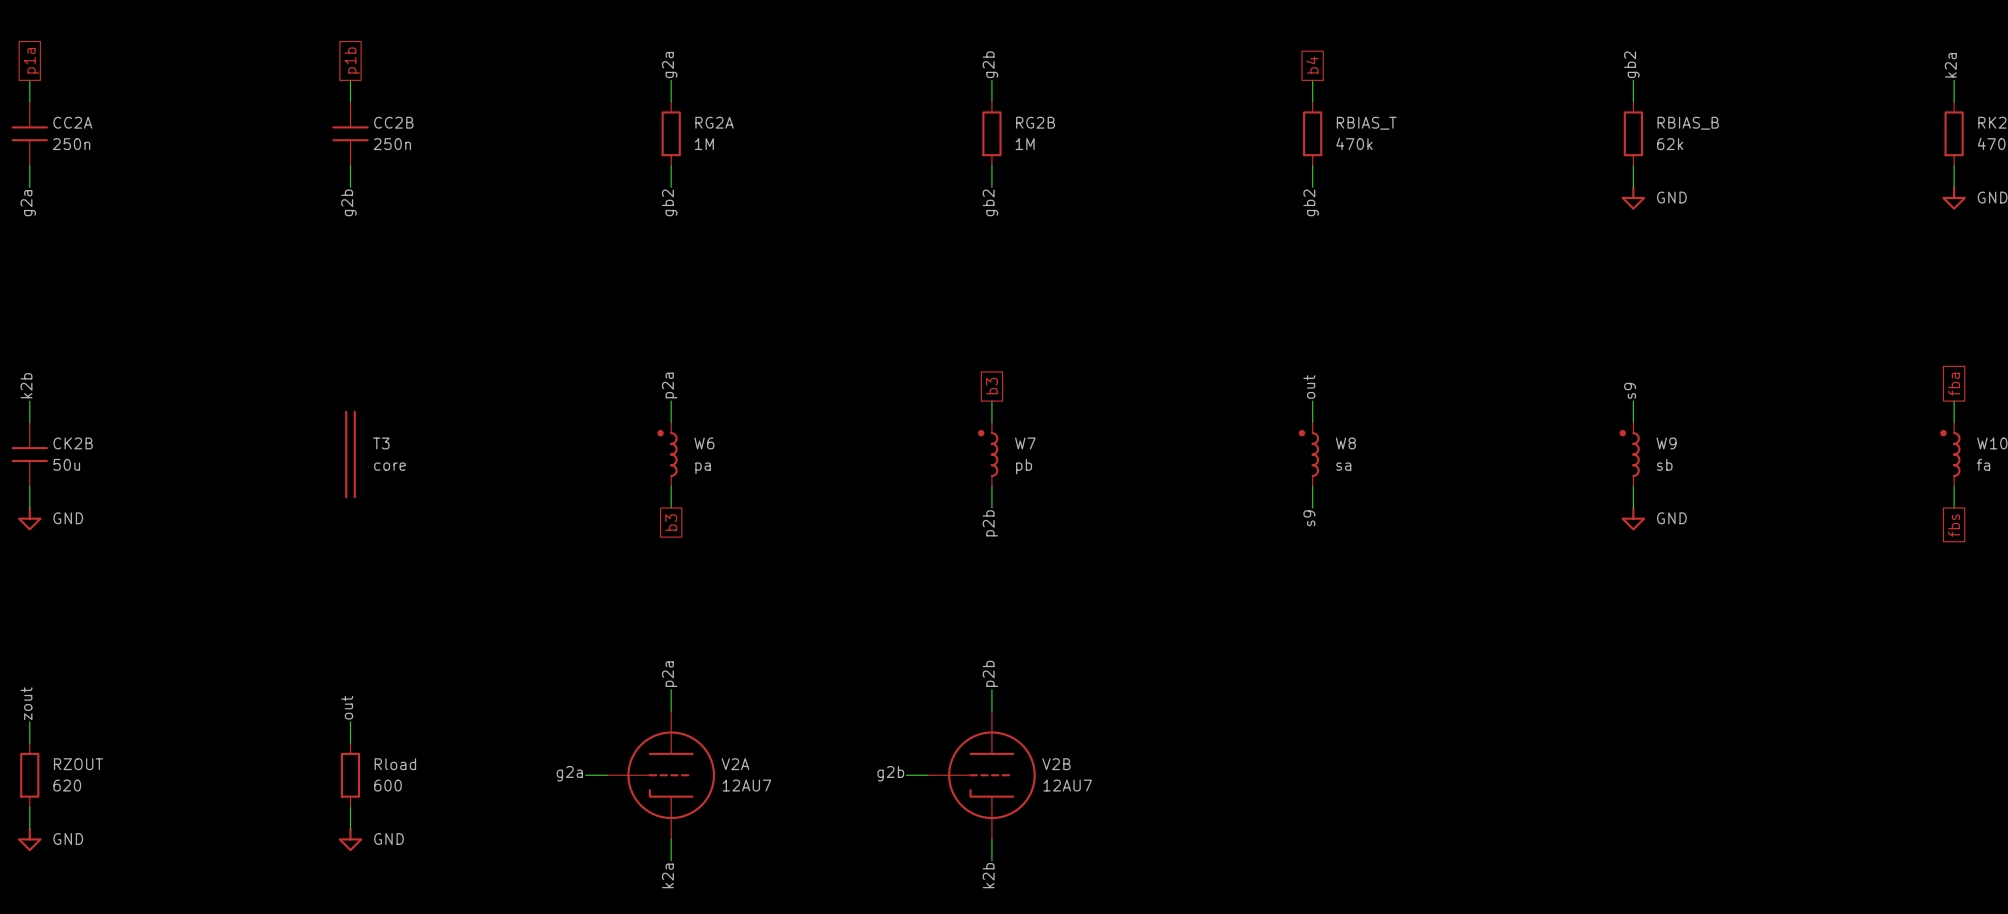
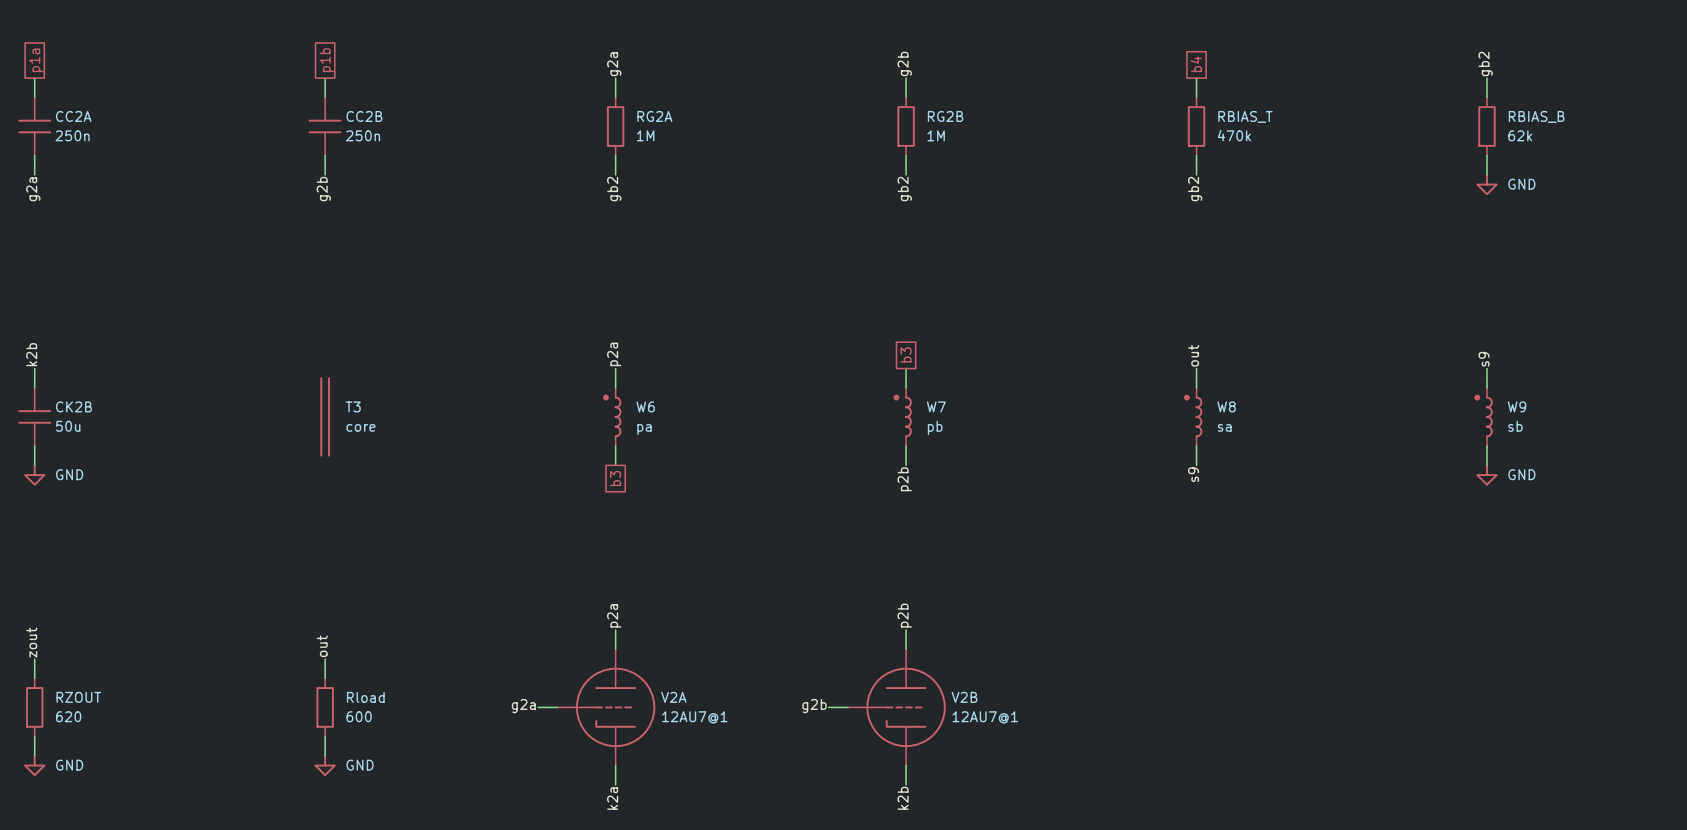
V2A value: 12AU7 (746, 785) -> 12AU7@1 (694, 717)
V2B value: 12AU7 (1067, 785) -> 12AU7@1 (985, 717)

